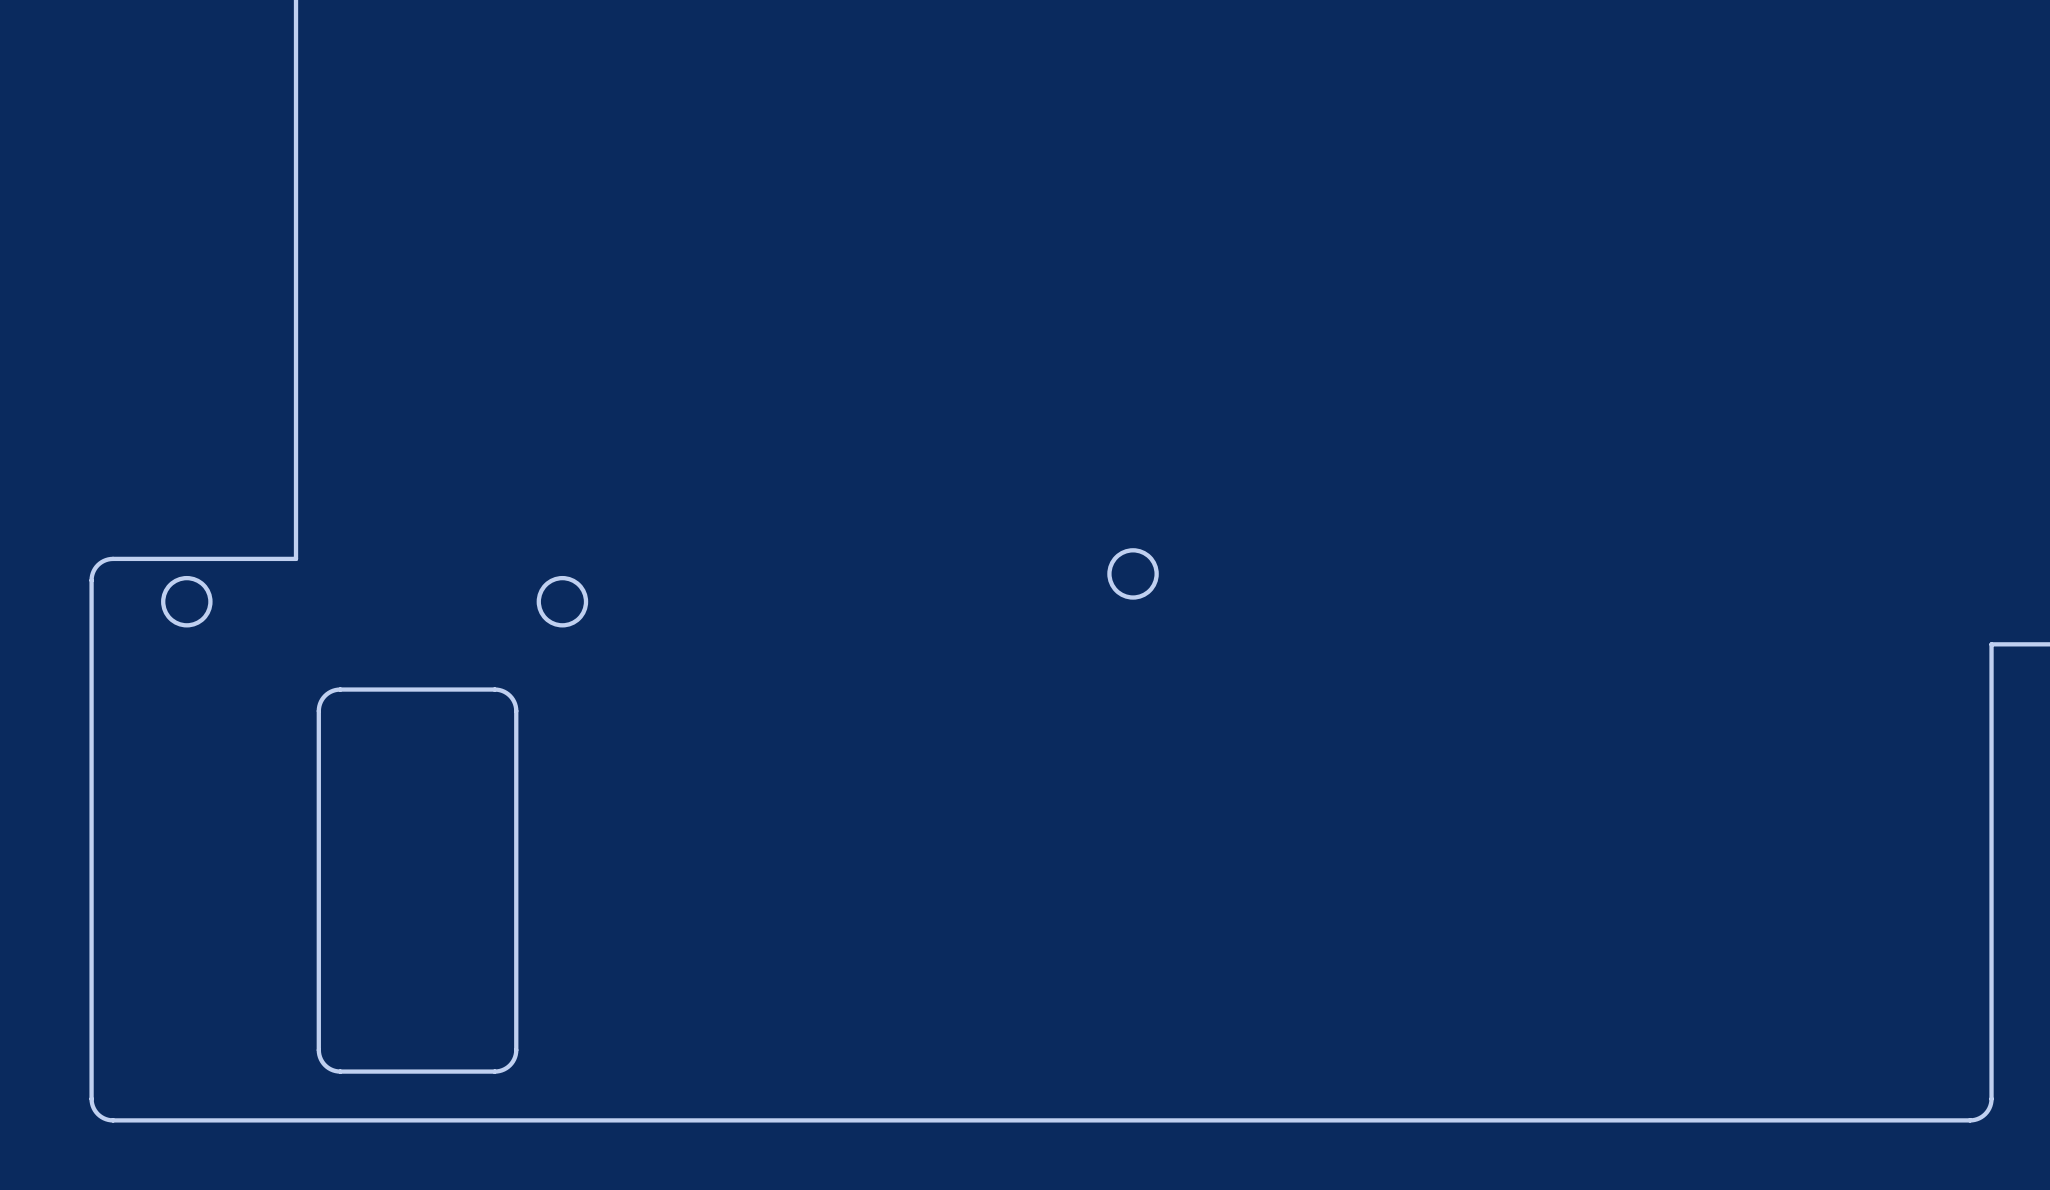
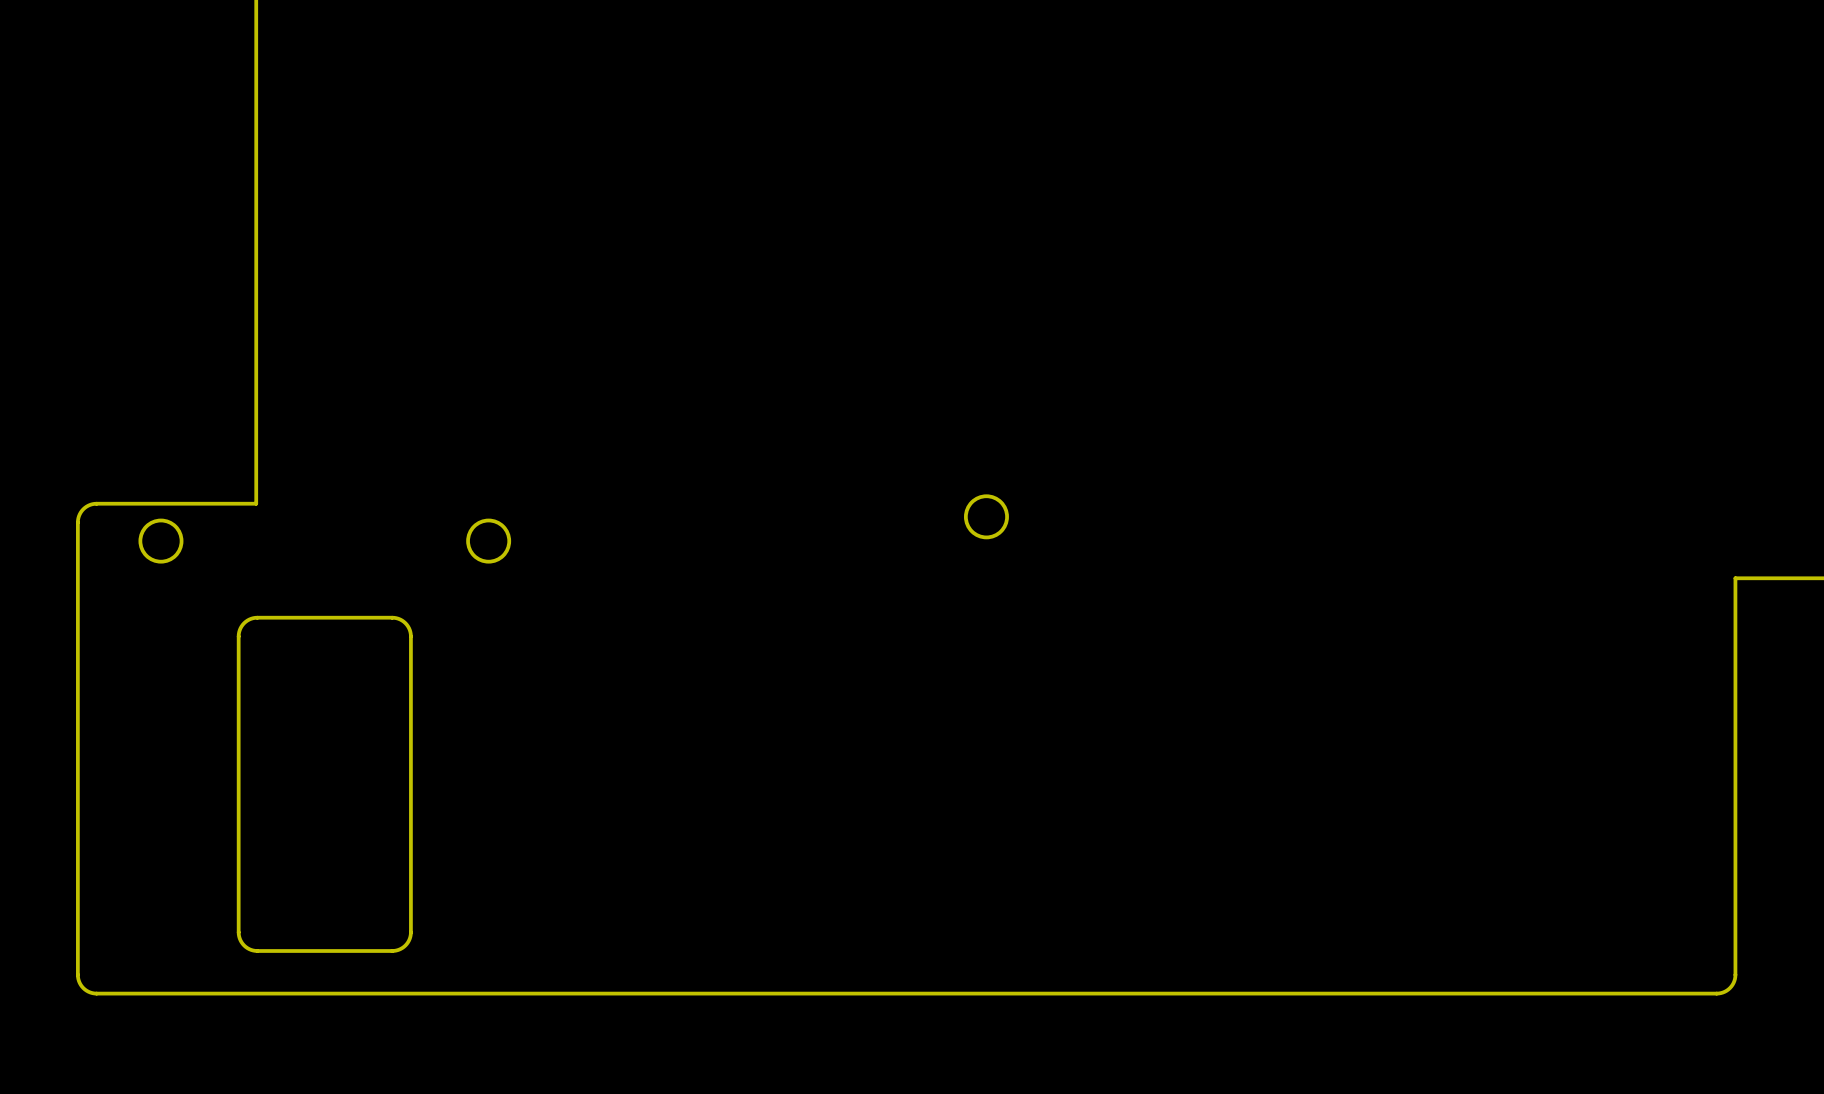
board edge: (340, 689) (333, 690) (325, 695) (320, 701) (318, 711) (318, 1052) (322, 1061) (326, 1066) (340, 1071) -> (294, 617) (251, 618) (241, 626) (238, 636) (239, 936) (244, 945) (253, 950) (294, 951)
board edge: (451, 689) (501, 690) (512, 699) (516, 711) (515, 1054) (509, 1065) (499, 1071) (451, 1071) -> (392, 617) (405, 623) (410, 636) (410, 934) (403, 946) (392, 951)

